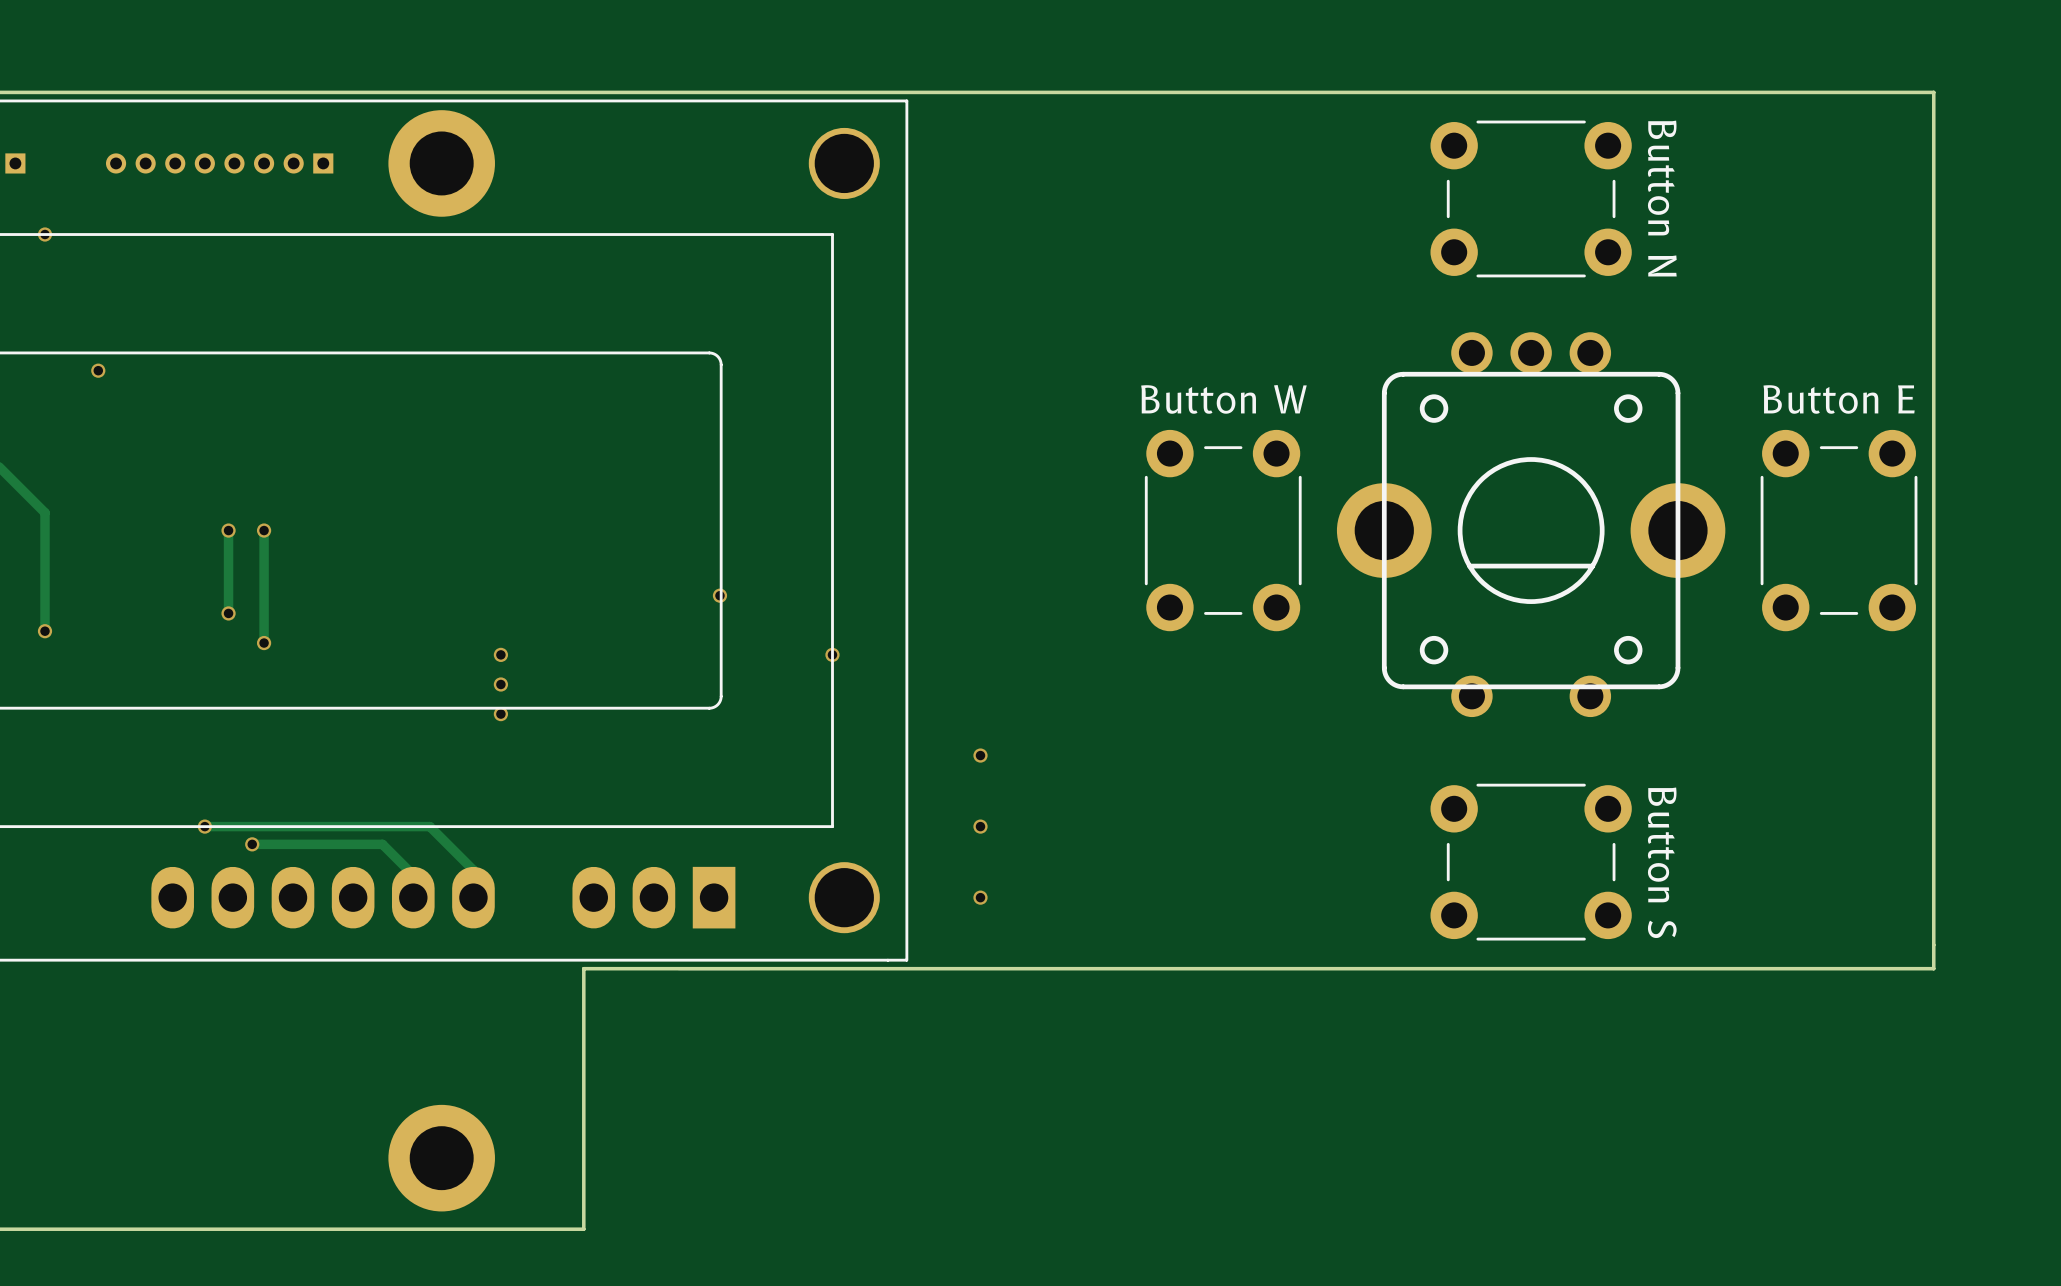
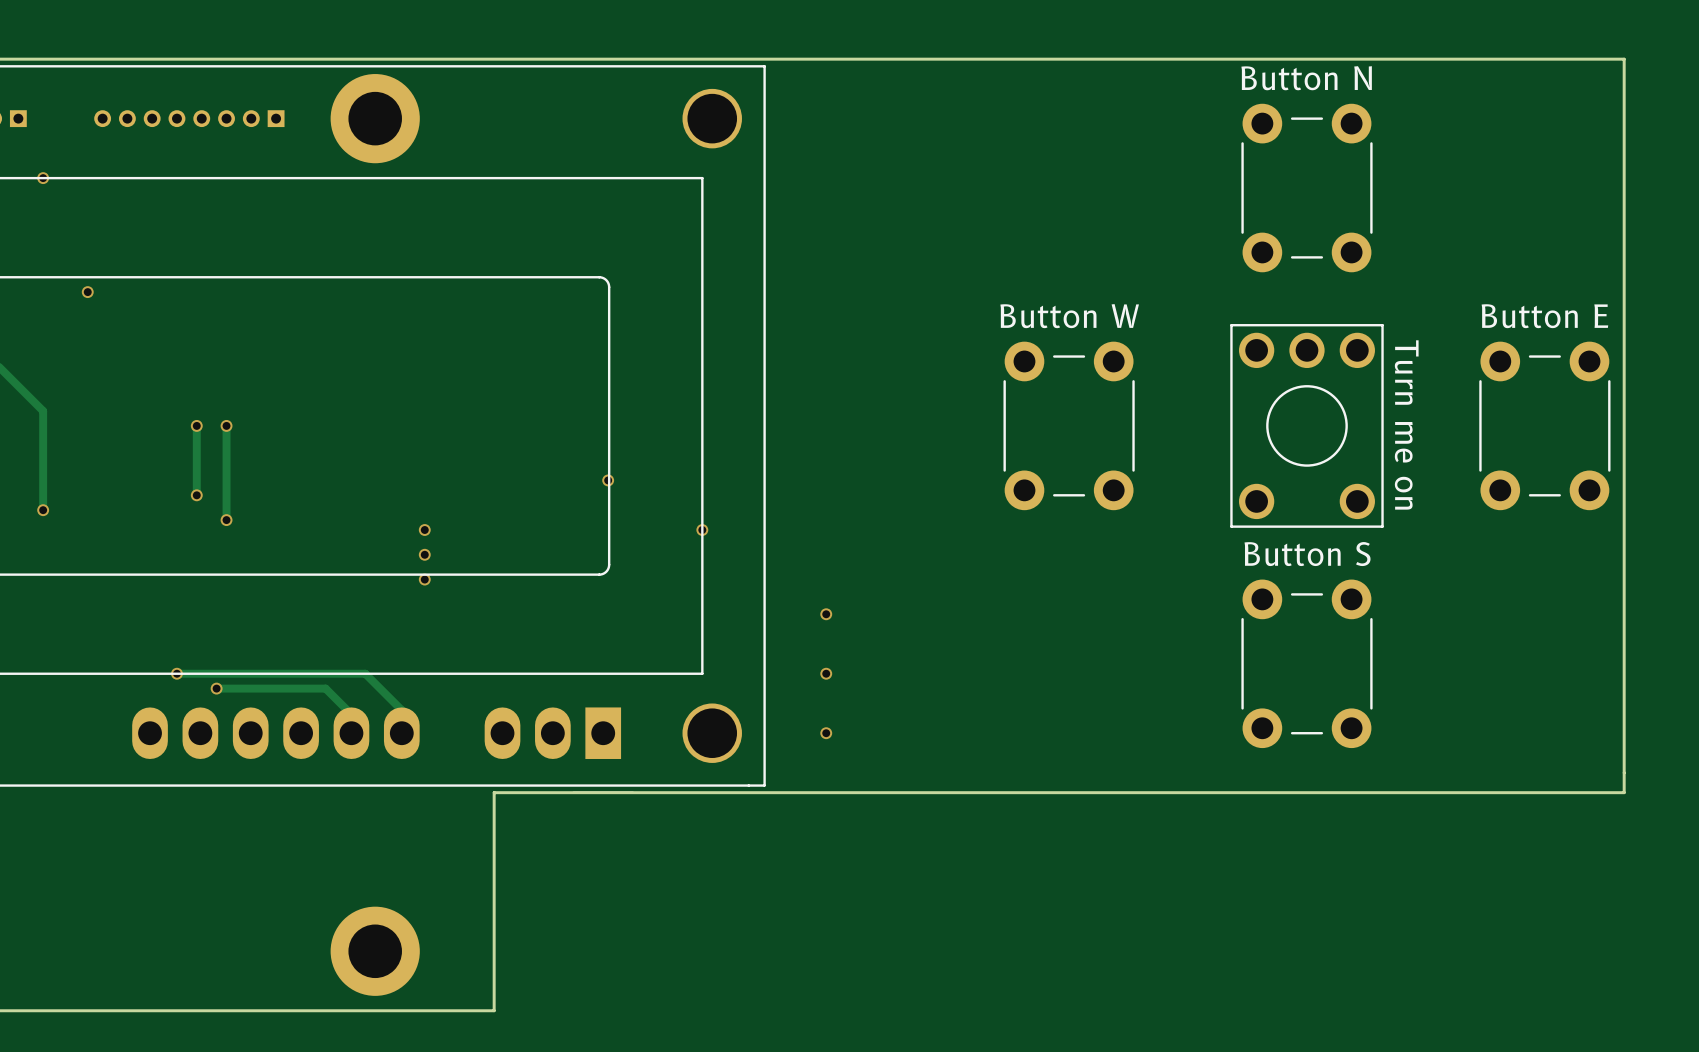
part rotation: 0° (1531, 198) -> 90° clockwise (1306, 188)
text rotation: 0° (1662, 198) -> 90° counterclockwise (1306, 78)
text position: Button W (1223, 399) -> Button W (1069, 316)
part: (1531, 524) -> none
text: none -> Turn me on (1406, 424)
part position: (1223, 530) -> (1069, 425)
part: none -> (1306, 425)
part rotation: 0° (1531, 862) -> 90° clockwise (1306, 663)
text rotation: 0° (1662, 862) -> 90° counterclockwise (1307, 554)

